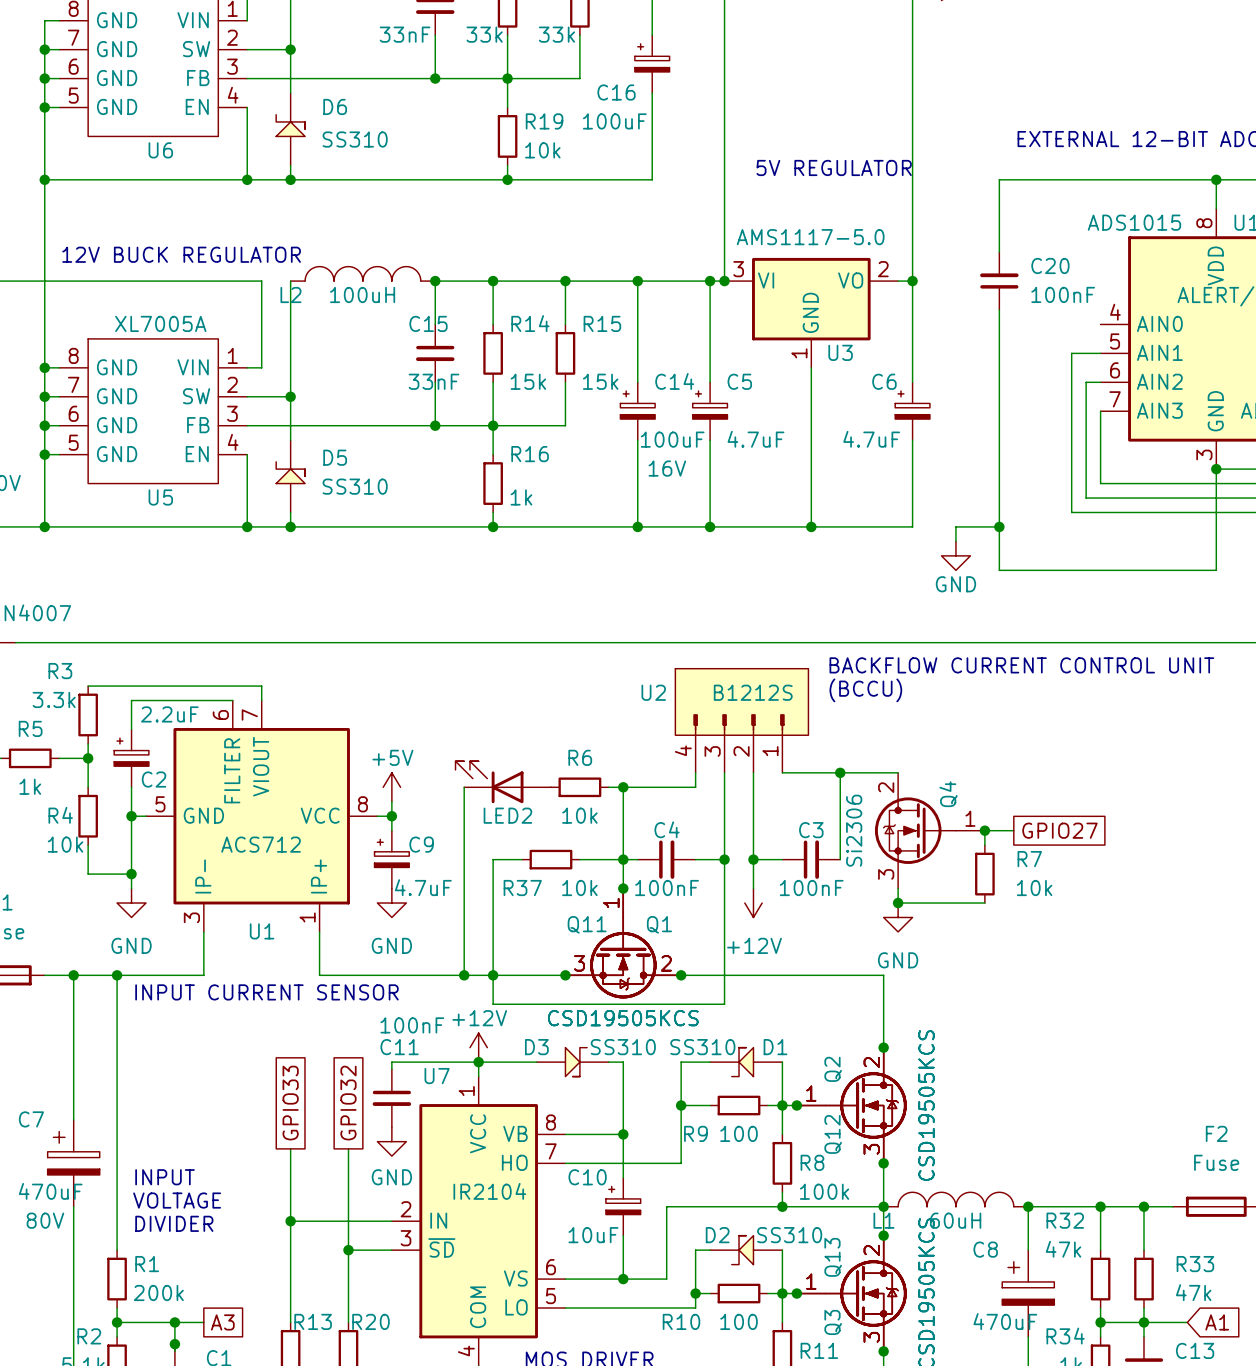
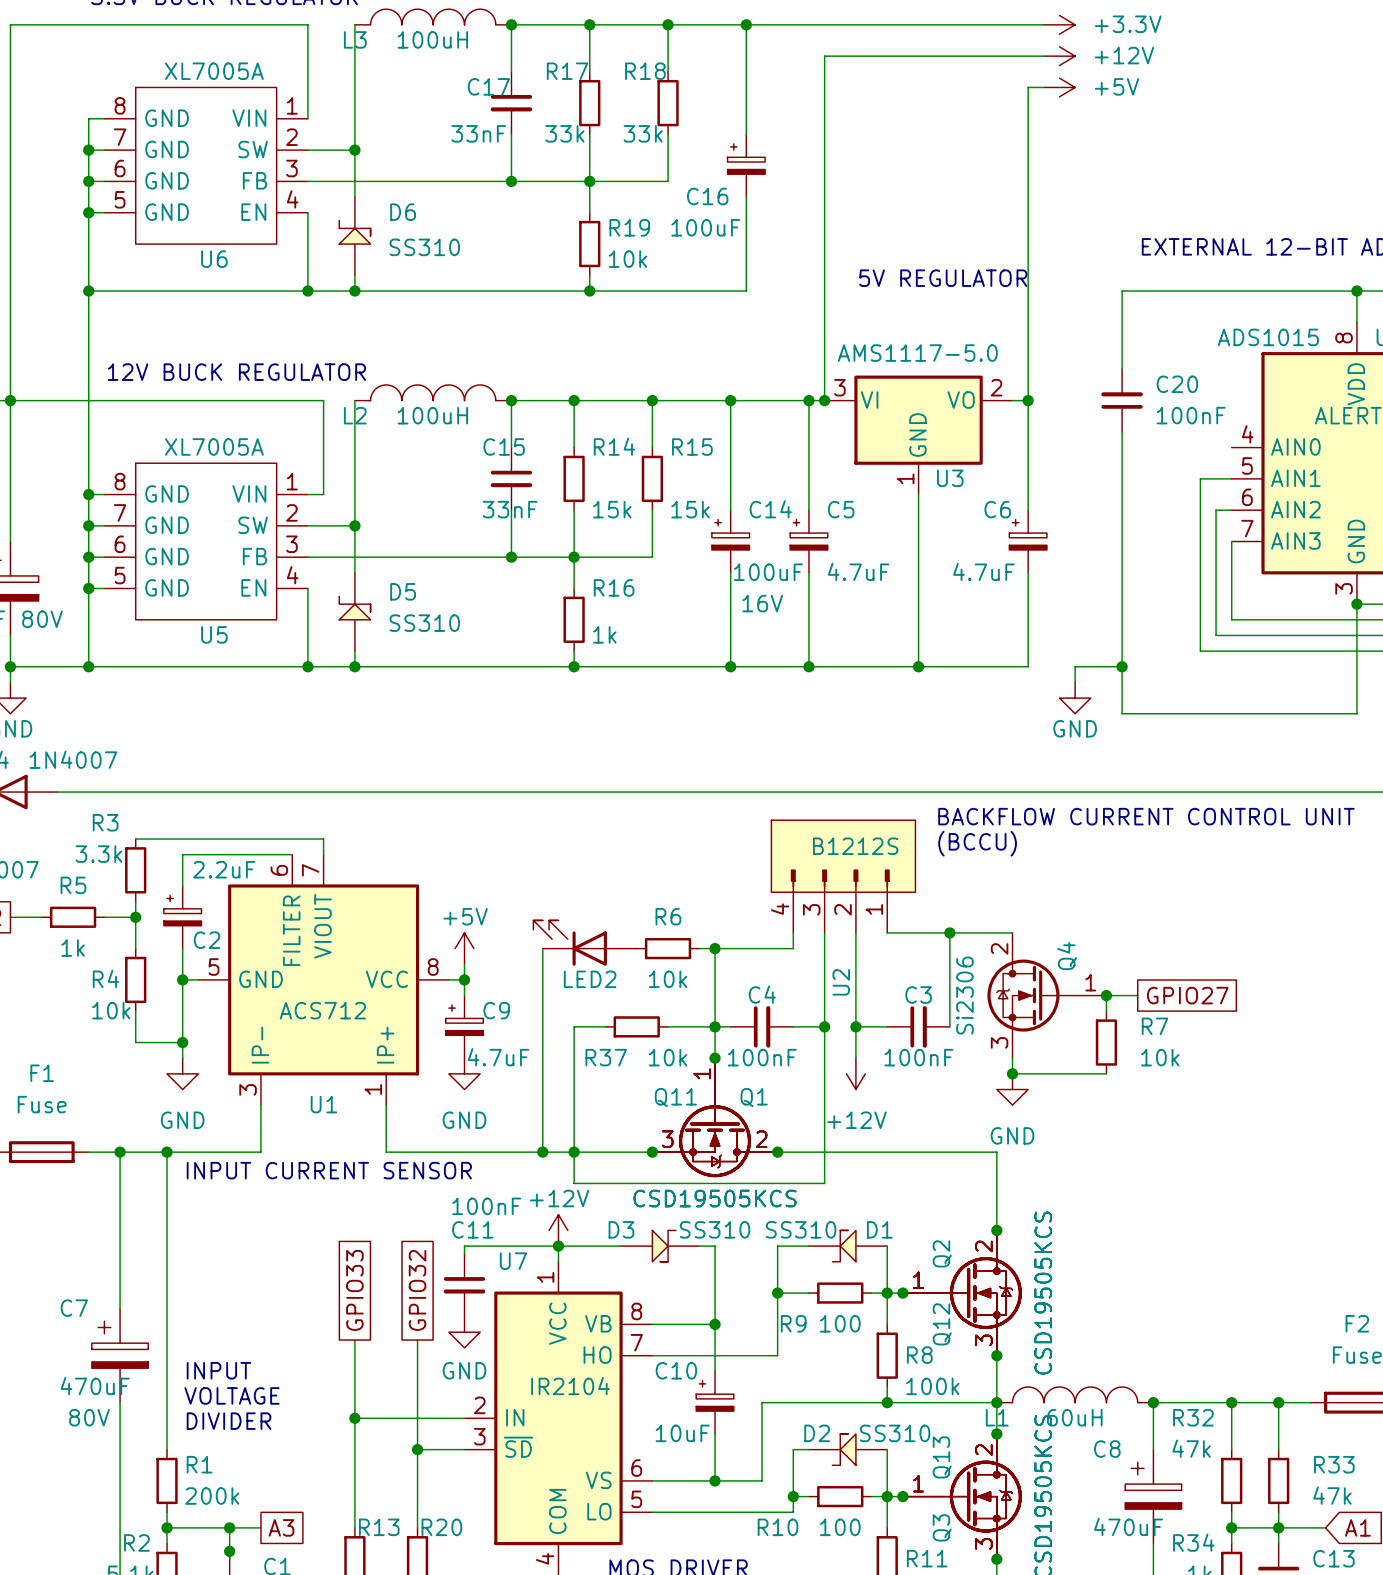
U2 name rotation: 0° (653, 692) -> 90° counterclockwise (841, 982)
U2 name position: U2 (653, 692) -> U2 (841, 982)

